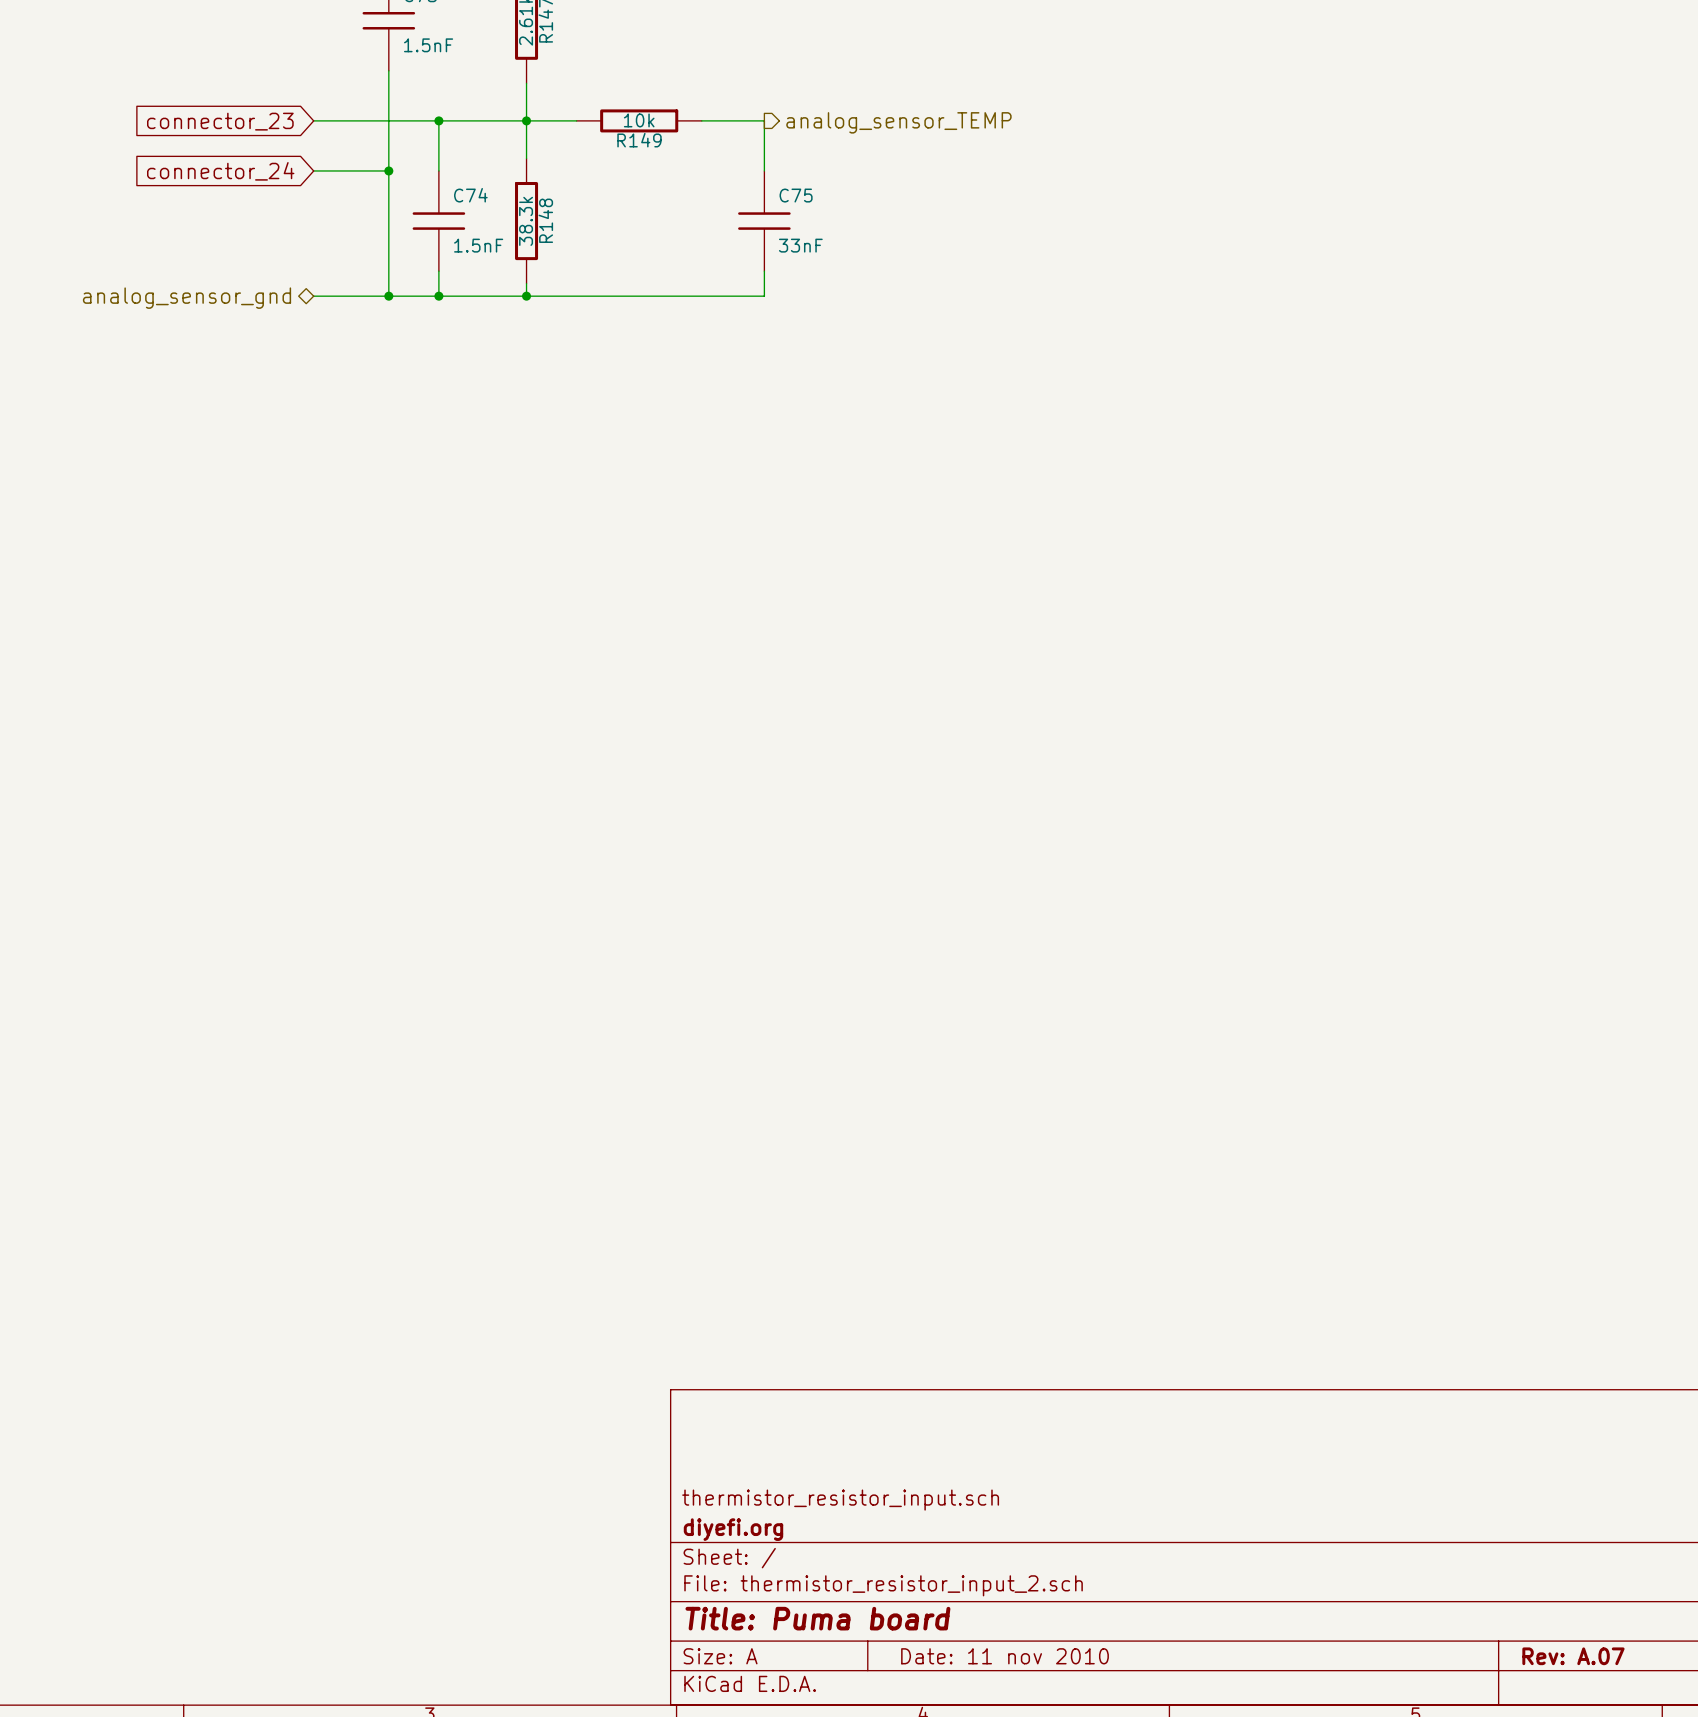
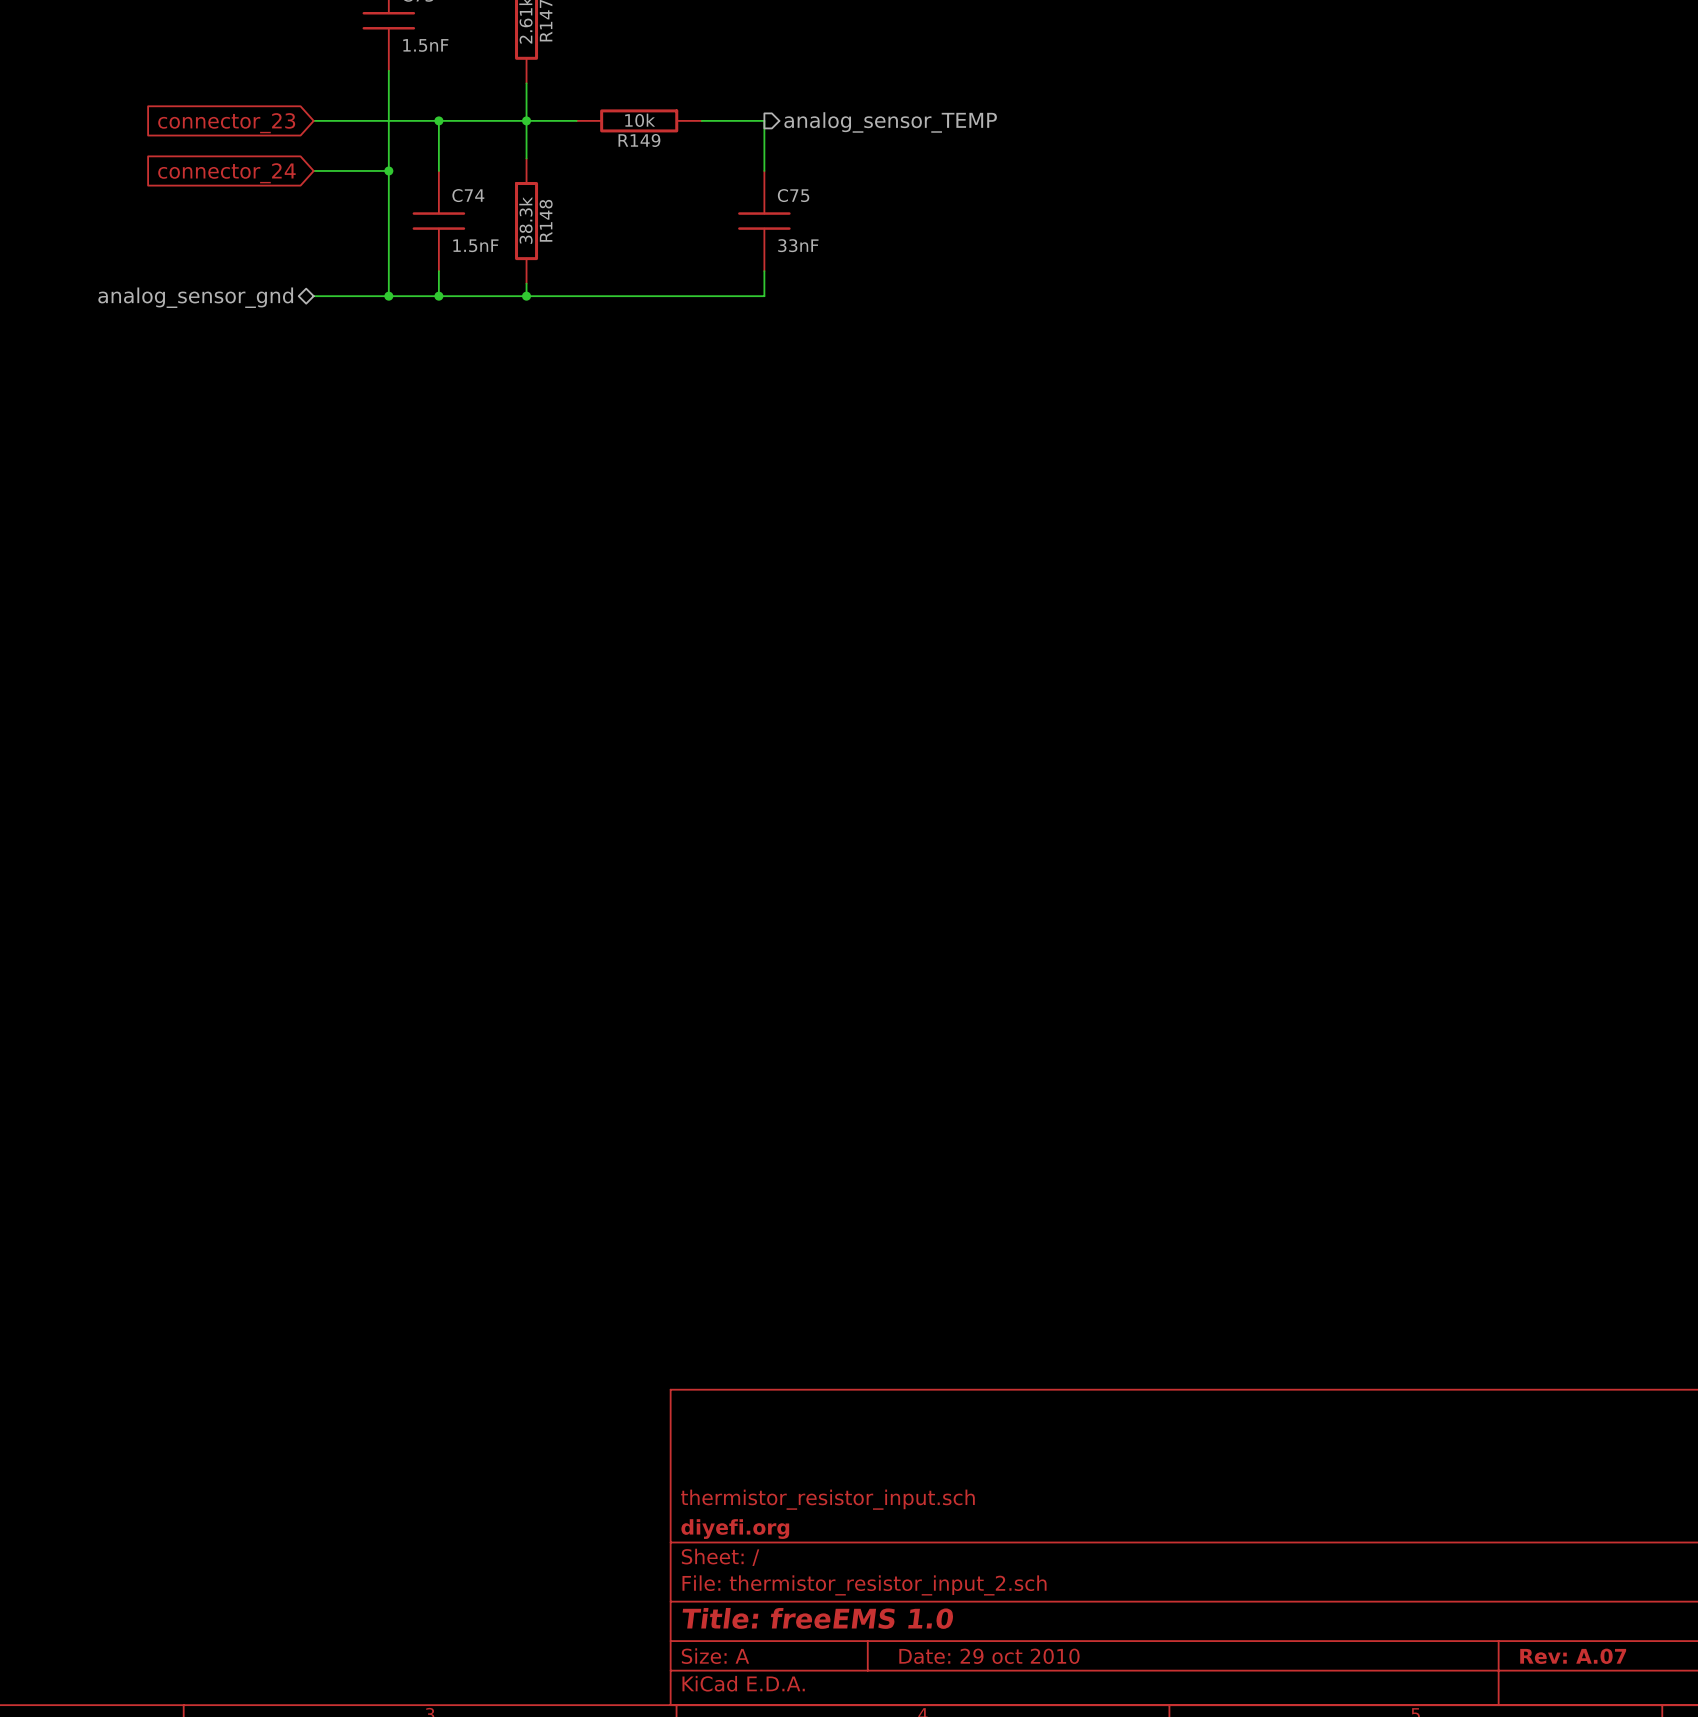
title block: Title: Puma board (817, 1618) -> Title: freeEMS 1.0 (818, 1618)
title block: Date: 11 nov 2010 (1005, 1656) -> Date: 29 oct 2010 (989, 1656)

